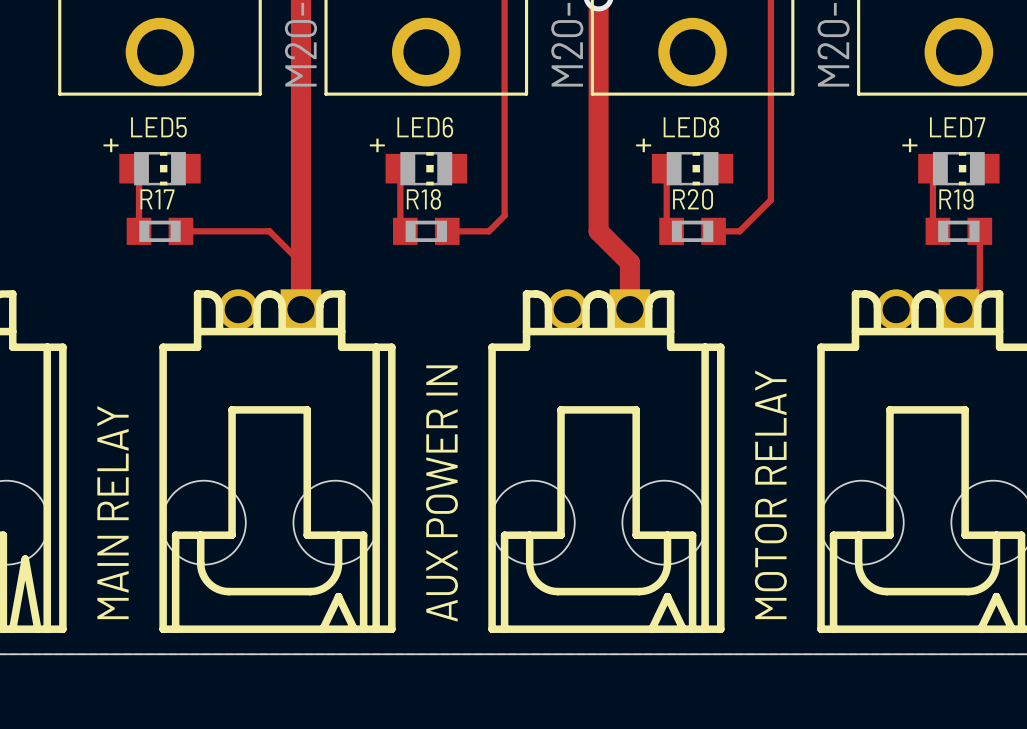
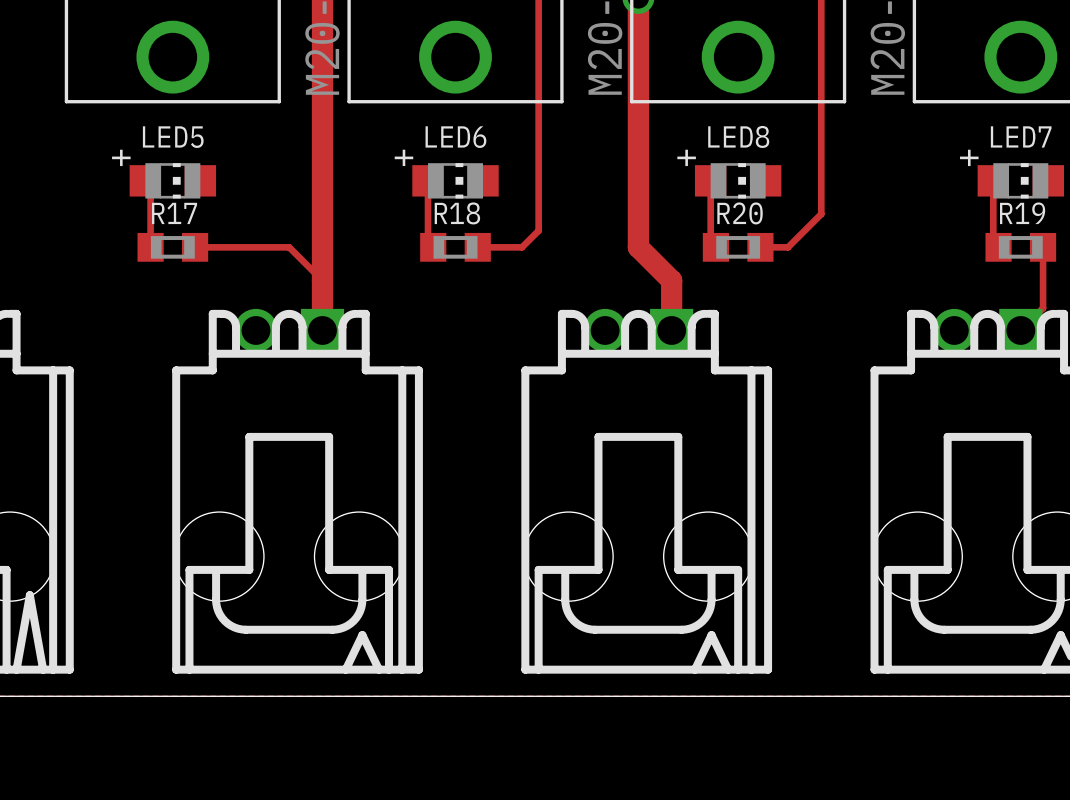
text: AUX POWER IN (441, 493) -> none
text: MOTOR RELAY (770, 494) -> none
text: MAIN RELAY (113, 512) -> none

